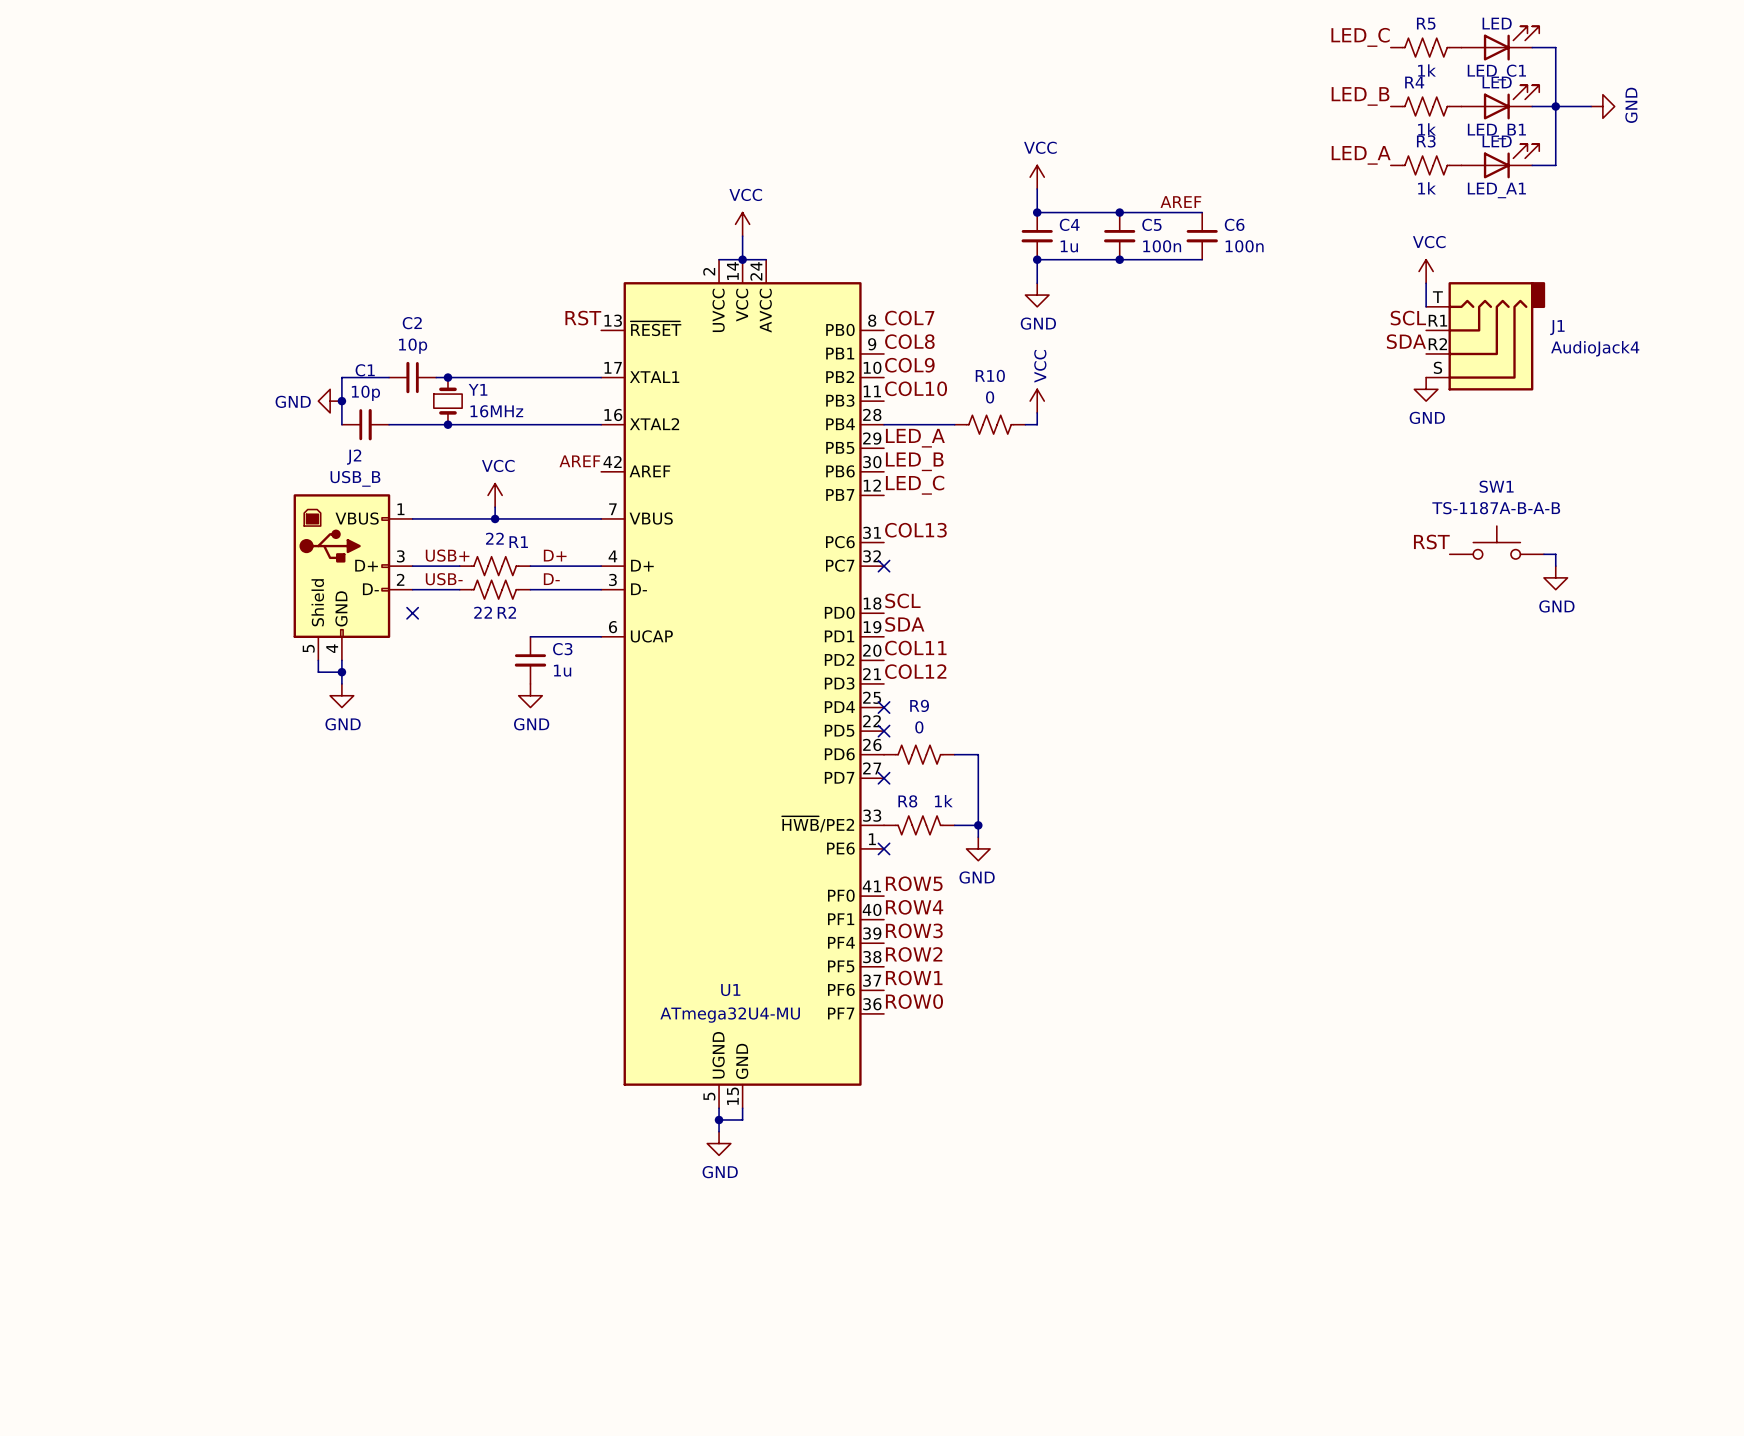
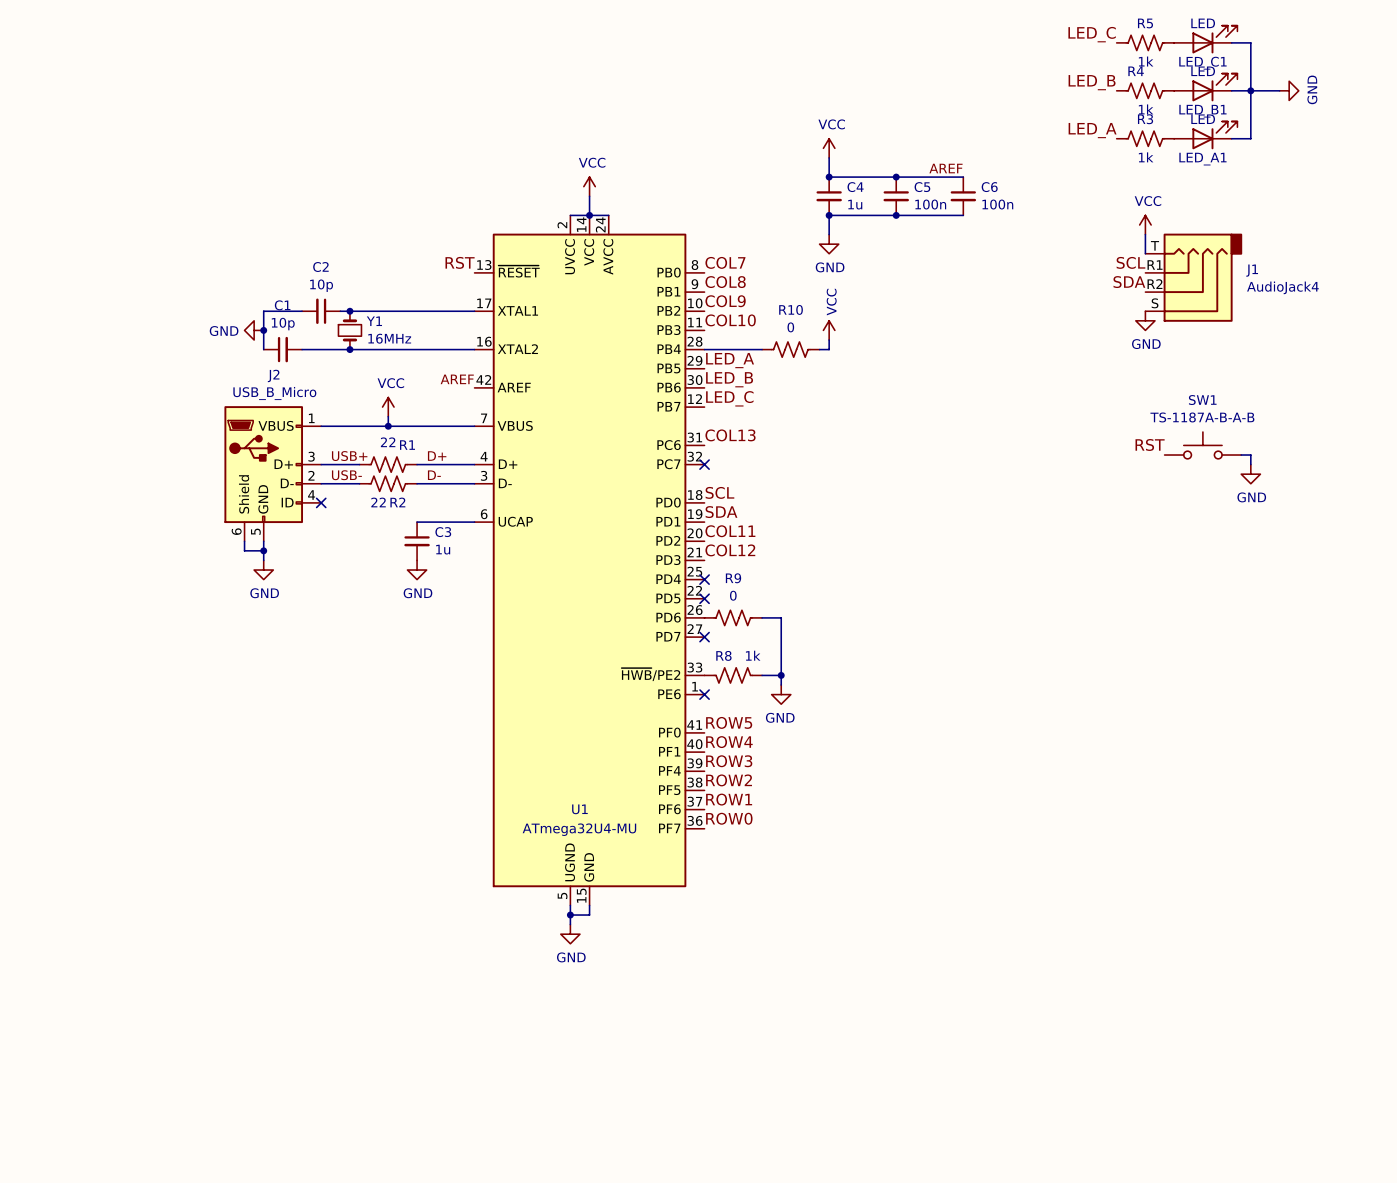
J2 value: USB_B (355, 478) -> USB_B_Micro (274, 393)
J2 symbol: [293, 494, 413, 661] -> [224, 406, 322, 542]

